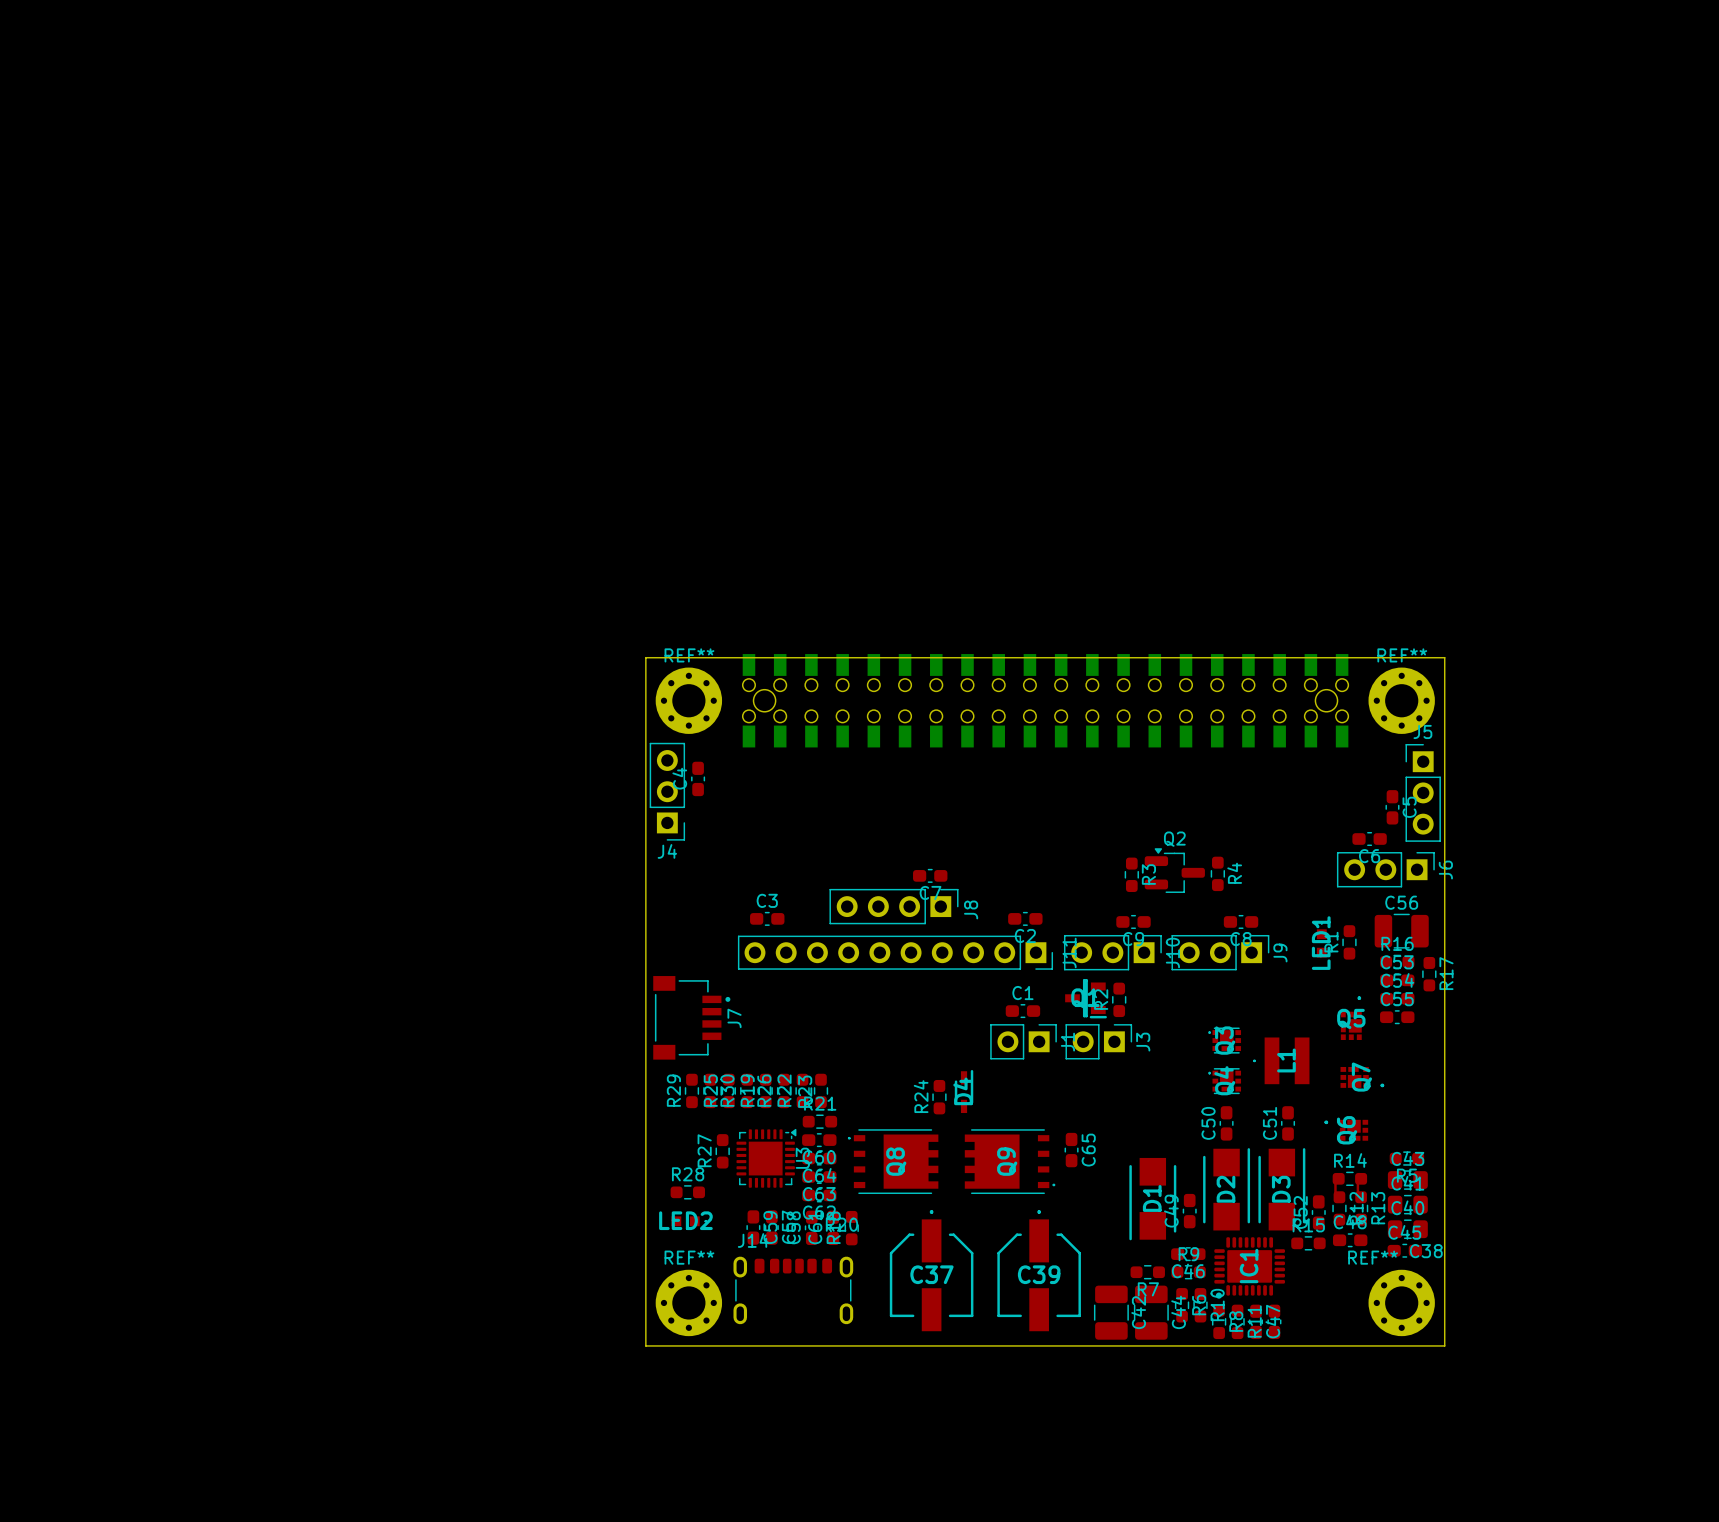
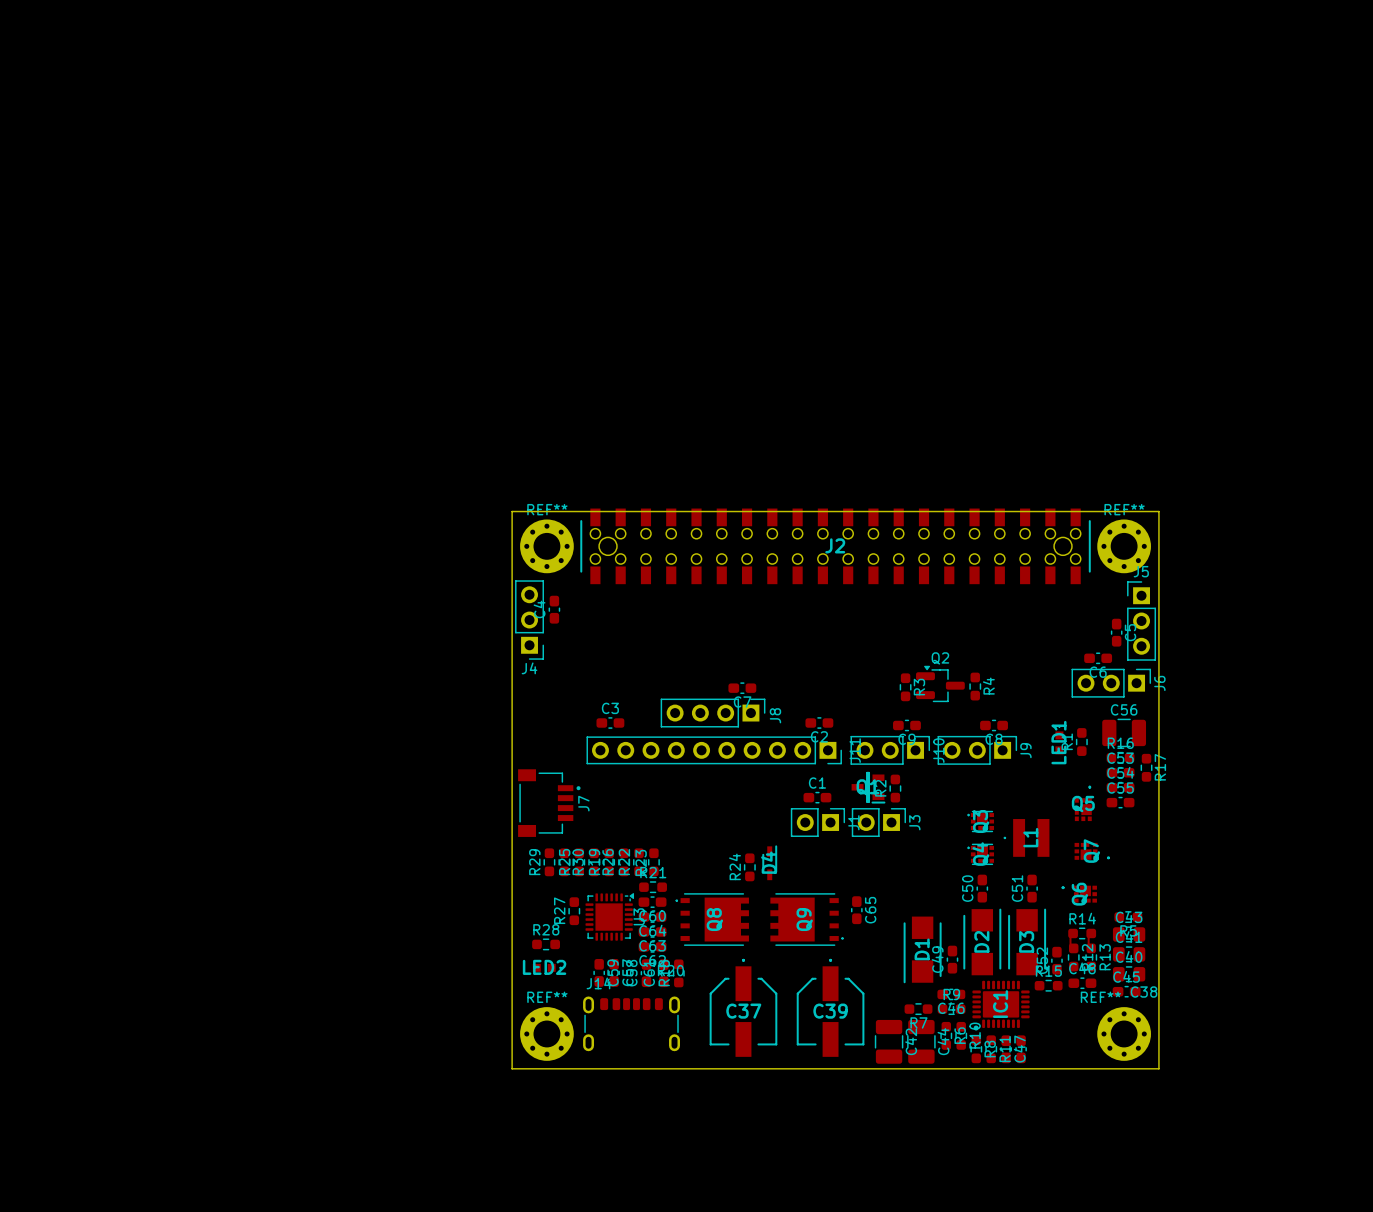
J2 side: bottom (1045, 700) -> top (835, 546)

